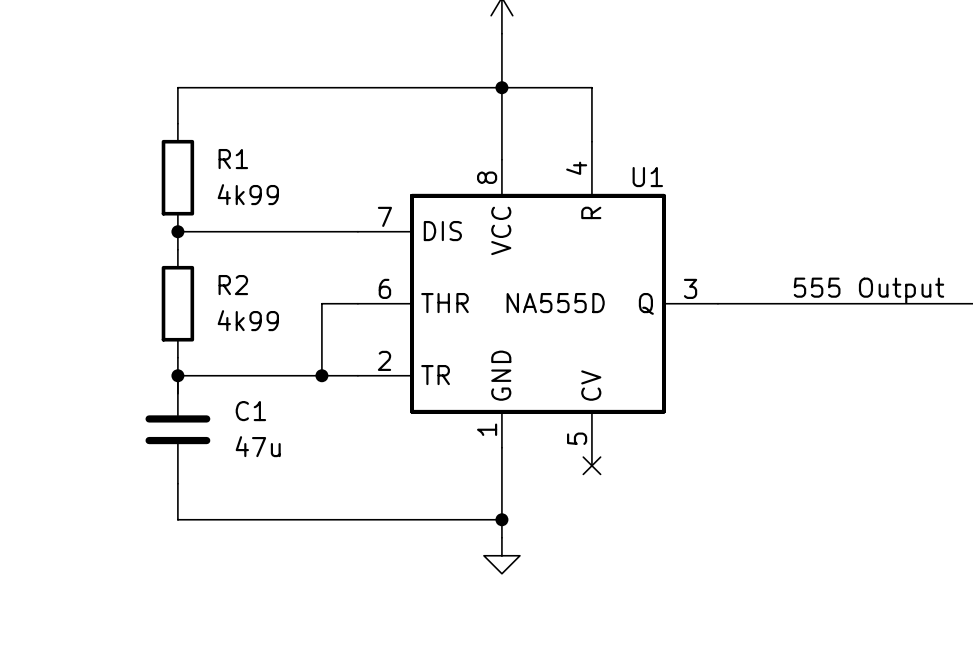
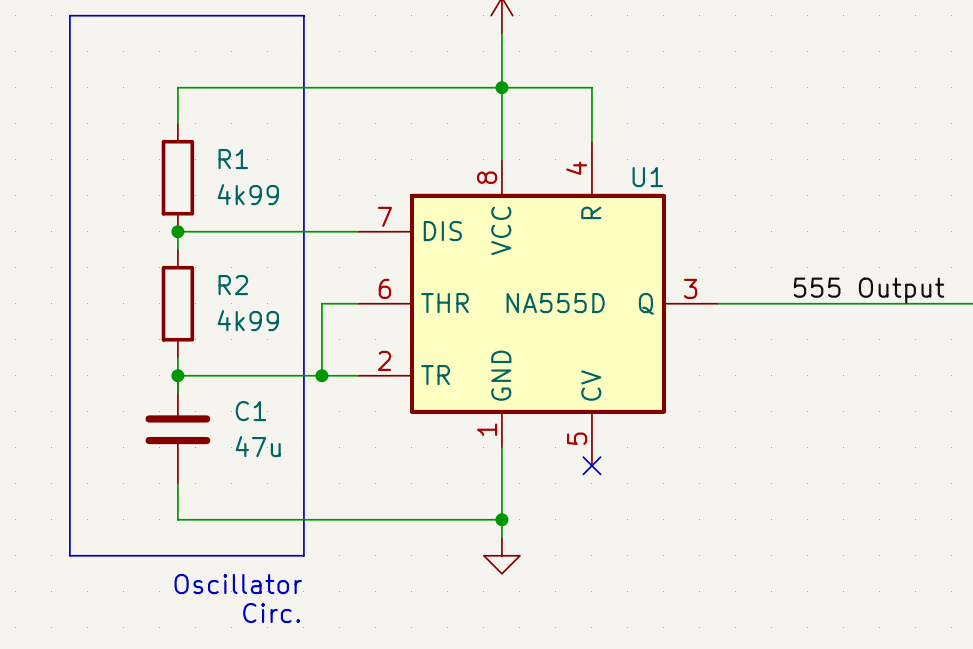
line: none -> (69, 15) (303, 15) (303, 555) (69, 555) (69, 15)
text: none -> Oscillator (238, 584)
text: none -> Circ. (271, 613)

